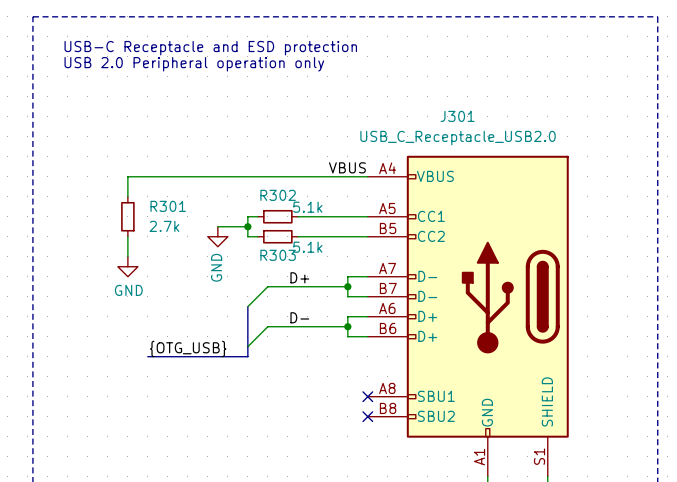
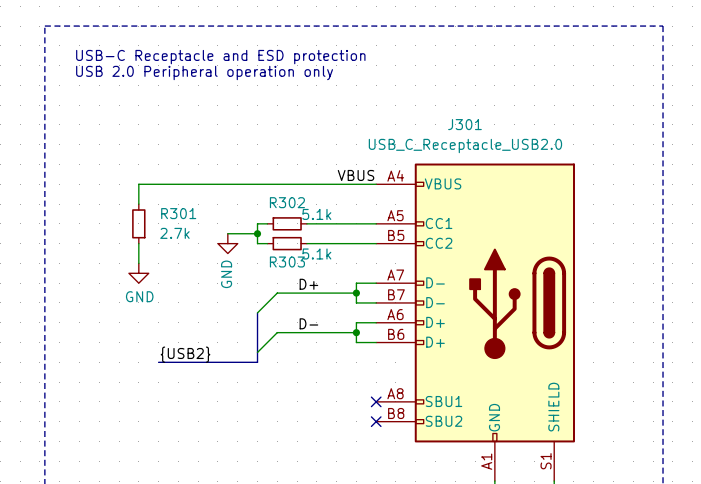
label: {OTG_USB} (188, 348) -> {USB2} (185, 354)

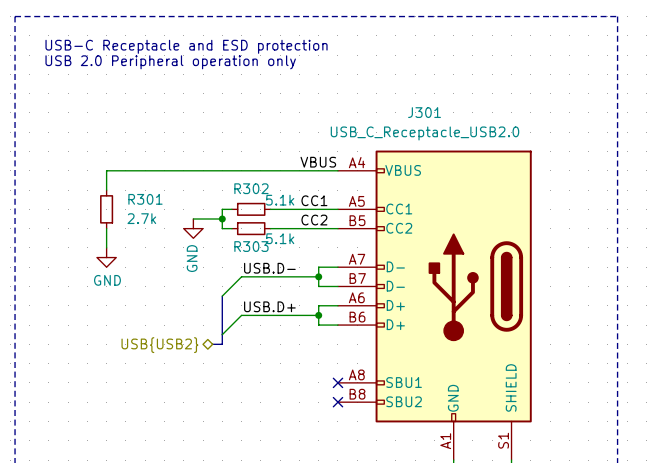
label: none -> CC1 (314, 200)
label: none -> CC2 (314, 220)
label: none -> USB.D- (269, 268)
label: D+ (308, 284) -> none
label: none -> USB.D+ (269, 306)
label: D- (308, 323) -> none
label: {USB2} (185, 354) -> none
bus: (158, 362) (247, 362) -> none
hierarchical label: none -> USB{USB2} (159, 345)

